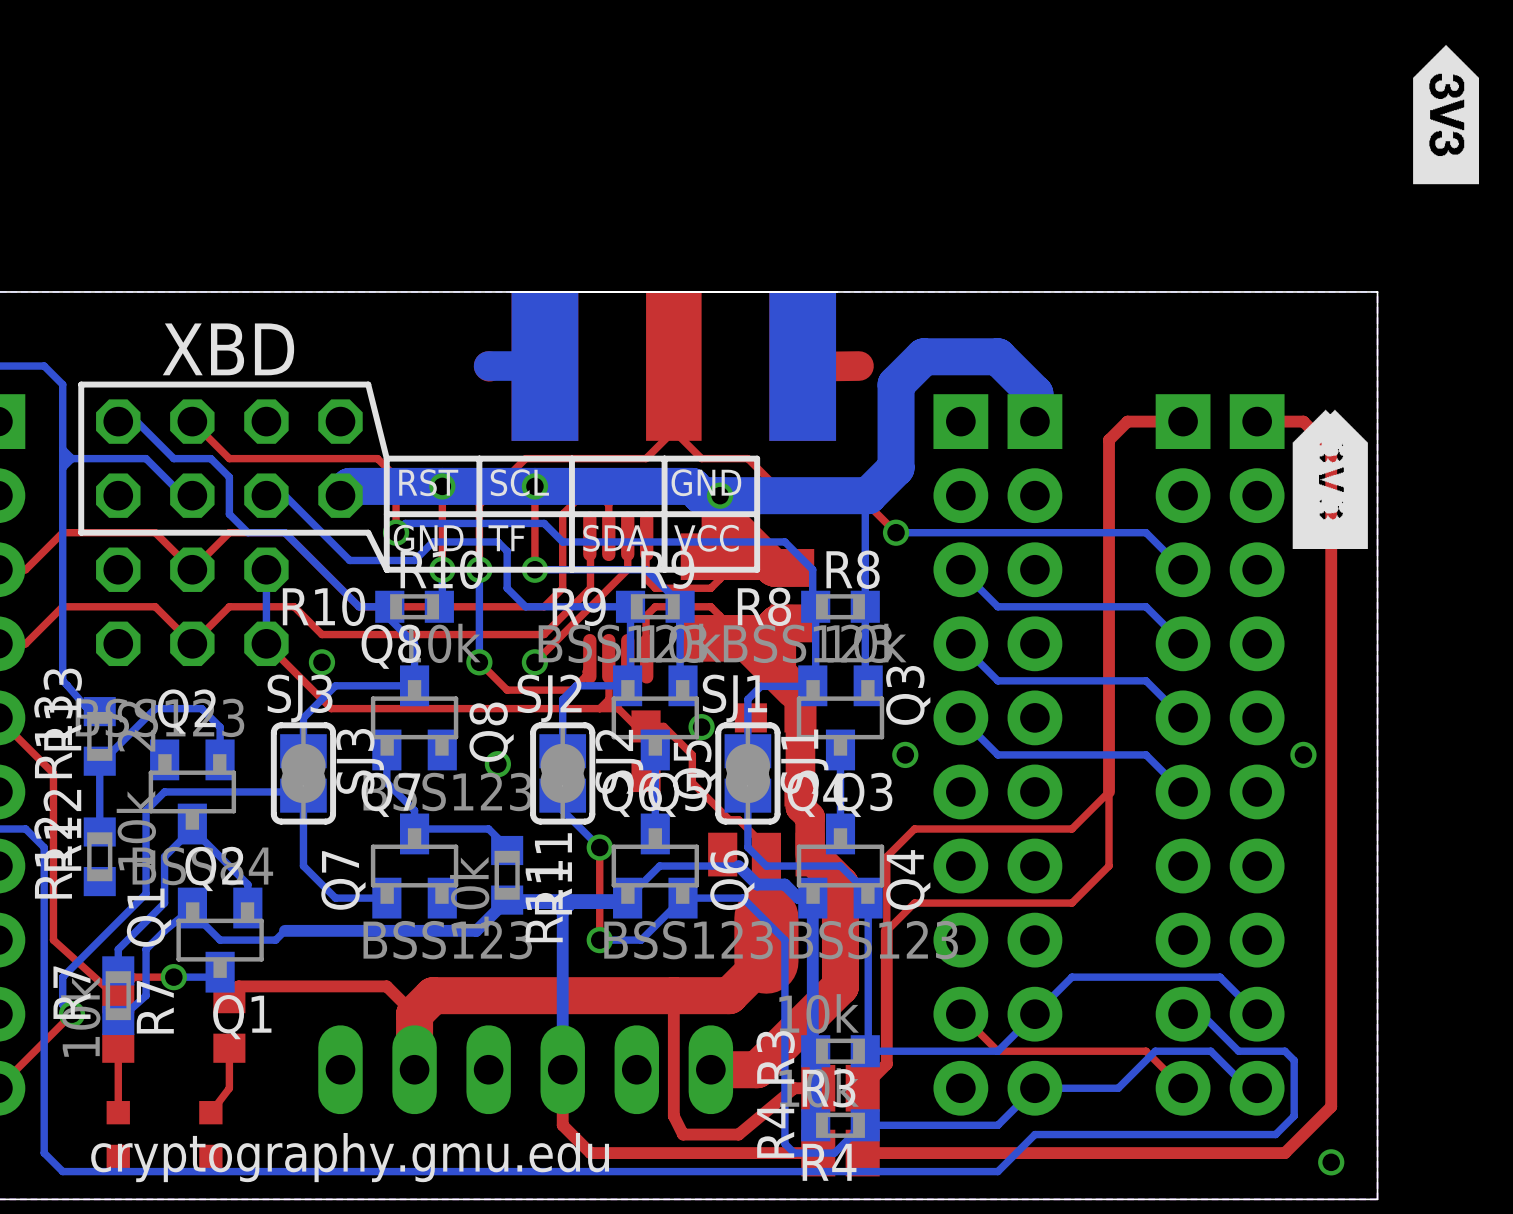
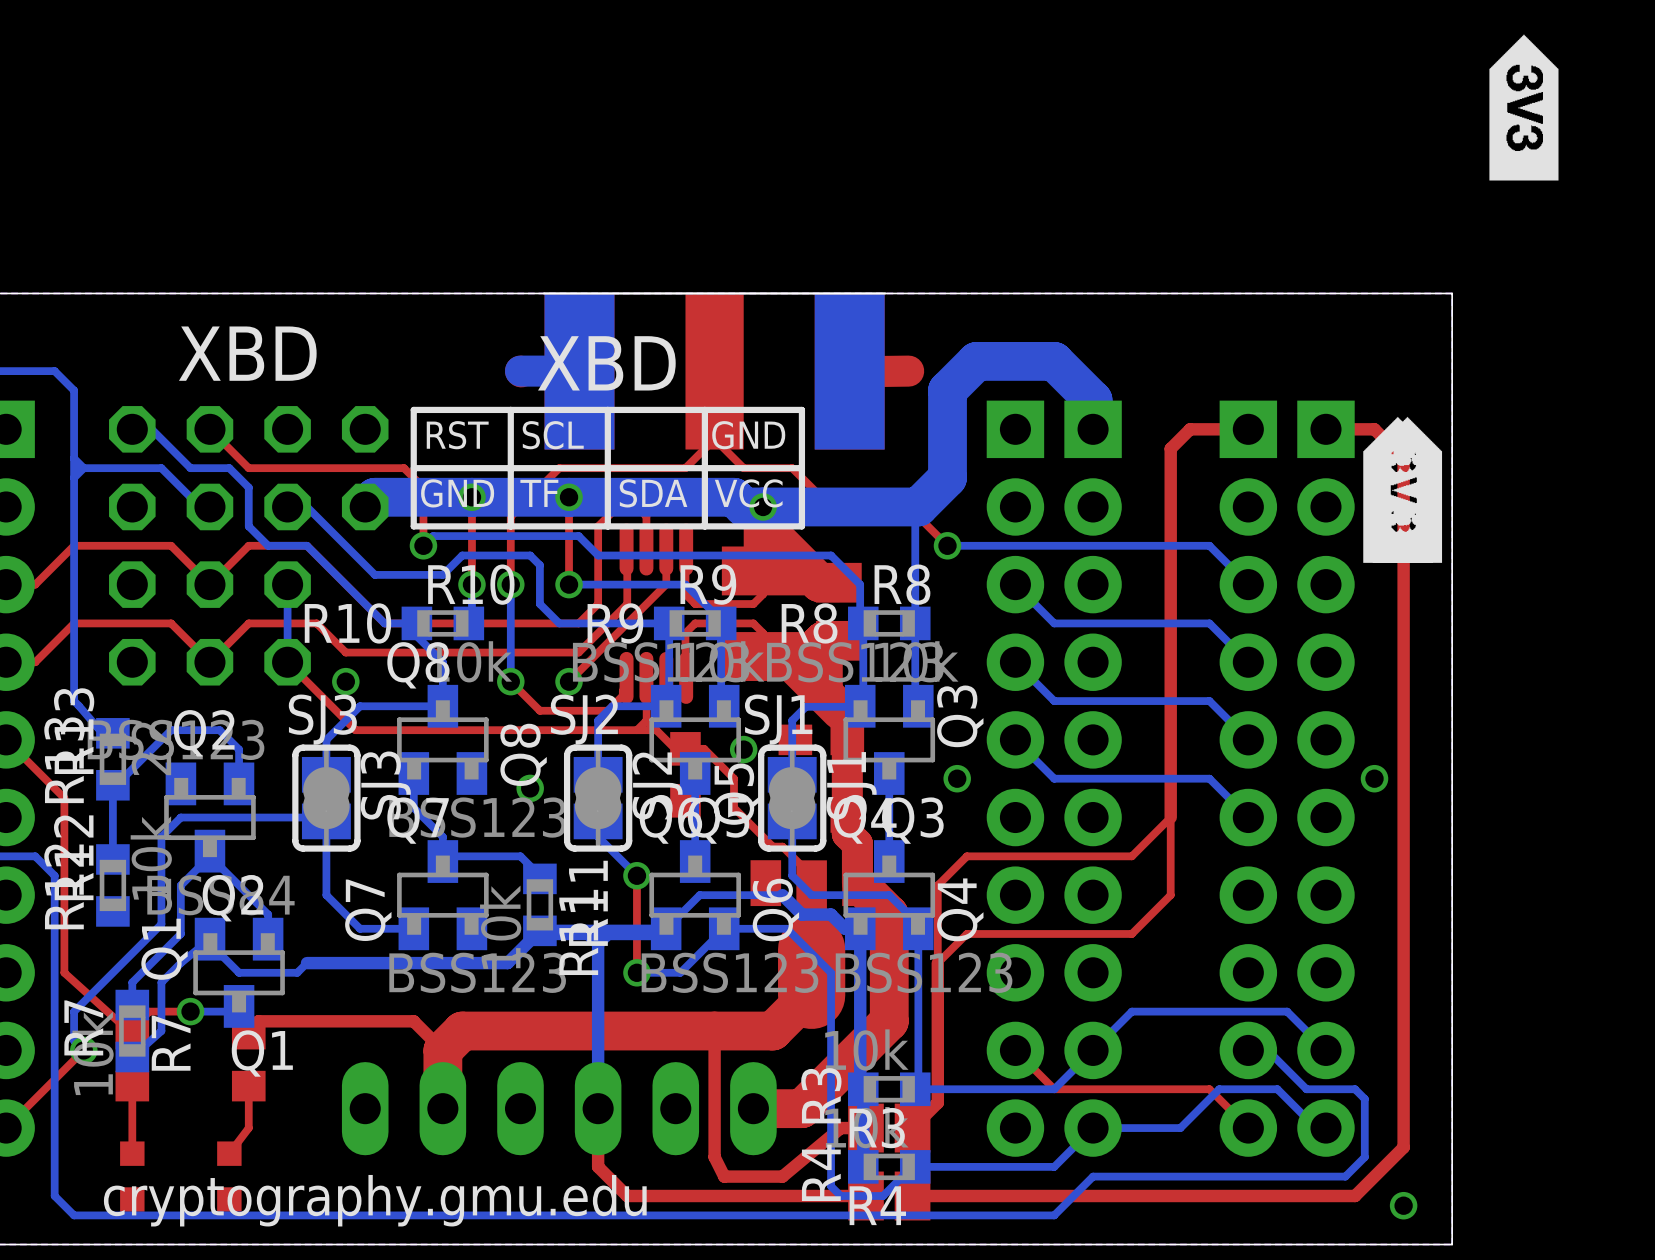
text: none -> XBD (606, 363)
text: none -> SCL (553, 435)
line: (386, 458) (368, 384) (81, 384) (81, 532) (368, 532) (386, 569) -> (413, 468) (413, 409) (801, 409) (801, 468)
text position: RST (428, 482) -> RST (457, 435)
text: SCL (519, 482) -> TF (539, 493)
text position: GND (706, 482) -> GND (748, 435)
line: (386, 514) (386, 569) -> none
line: (479, 514) (479, 569) -> (510, 409) (510, 468)
line: (571, 514) (571, 569) -> (607, 409) (607, 468)
line: (664, 514) (664, 569) -> (704, 409) (704, 468)
line: (757, 514) (757, 569) (386, 569) -> none
text position: GND (428, 538) -> GND (457, 493)
text: TF (506, 538) -> none
text position: SDA (615, 538) -> SDA (653, 493)
text position: VCC (706, 538) -> VCC (748, 493)

